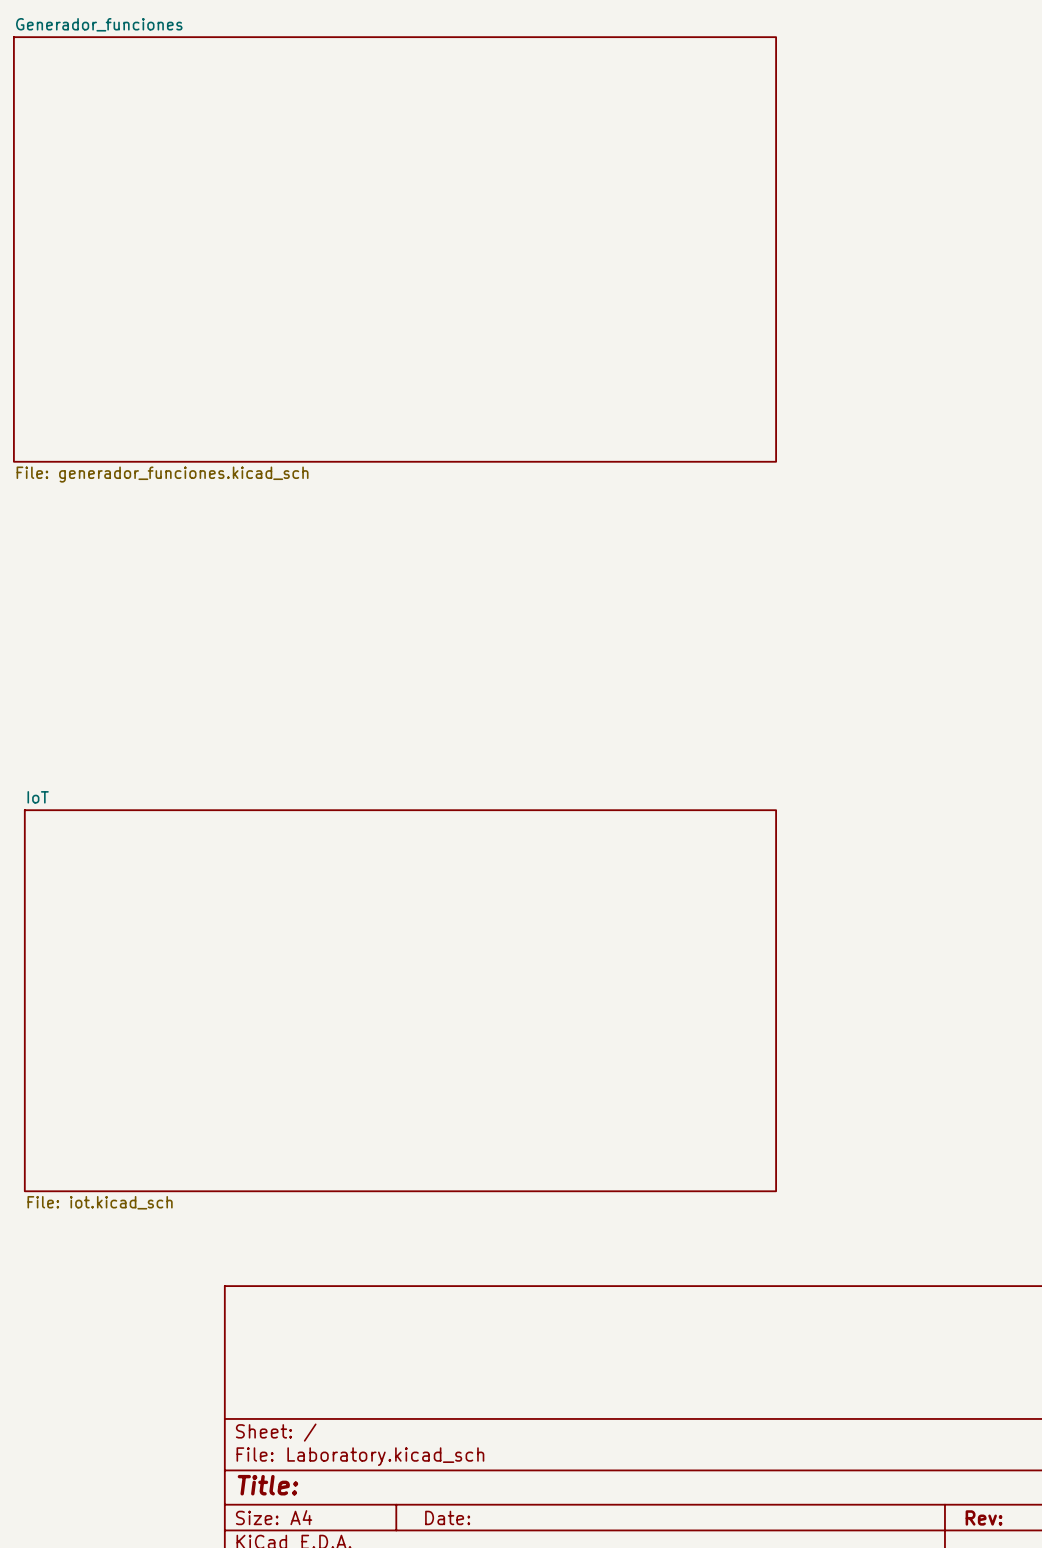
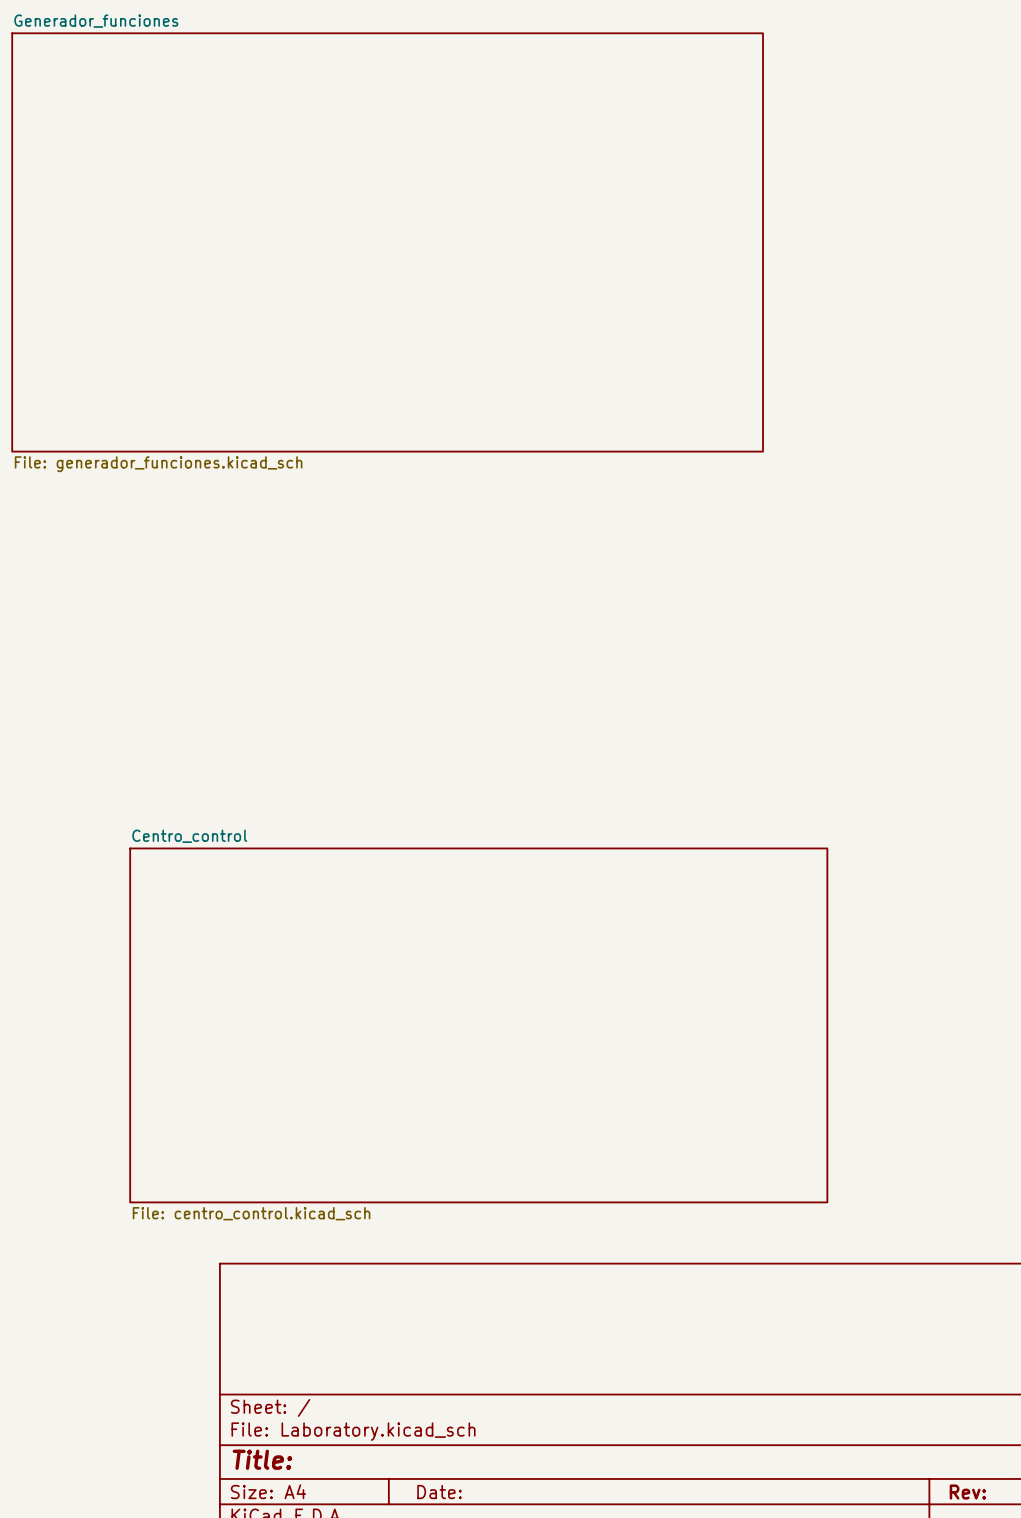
sheet IoT: File: iot.kicad_sch (400, 1000) -> none
sheet Centro_control: none -> File: centro_control.kicad_sch (478, 1025)

